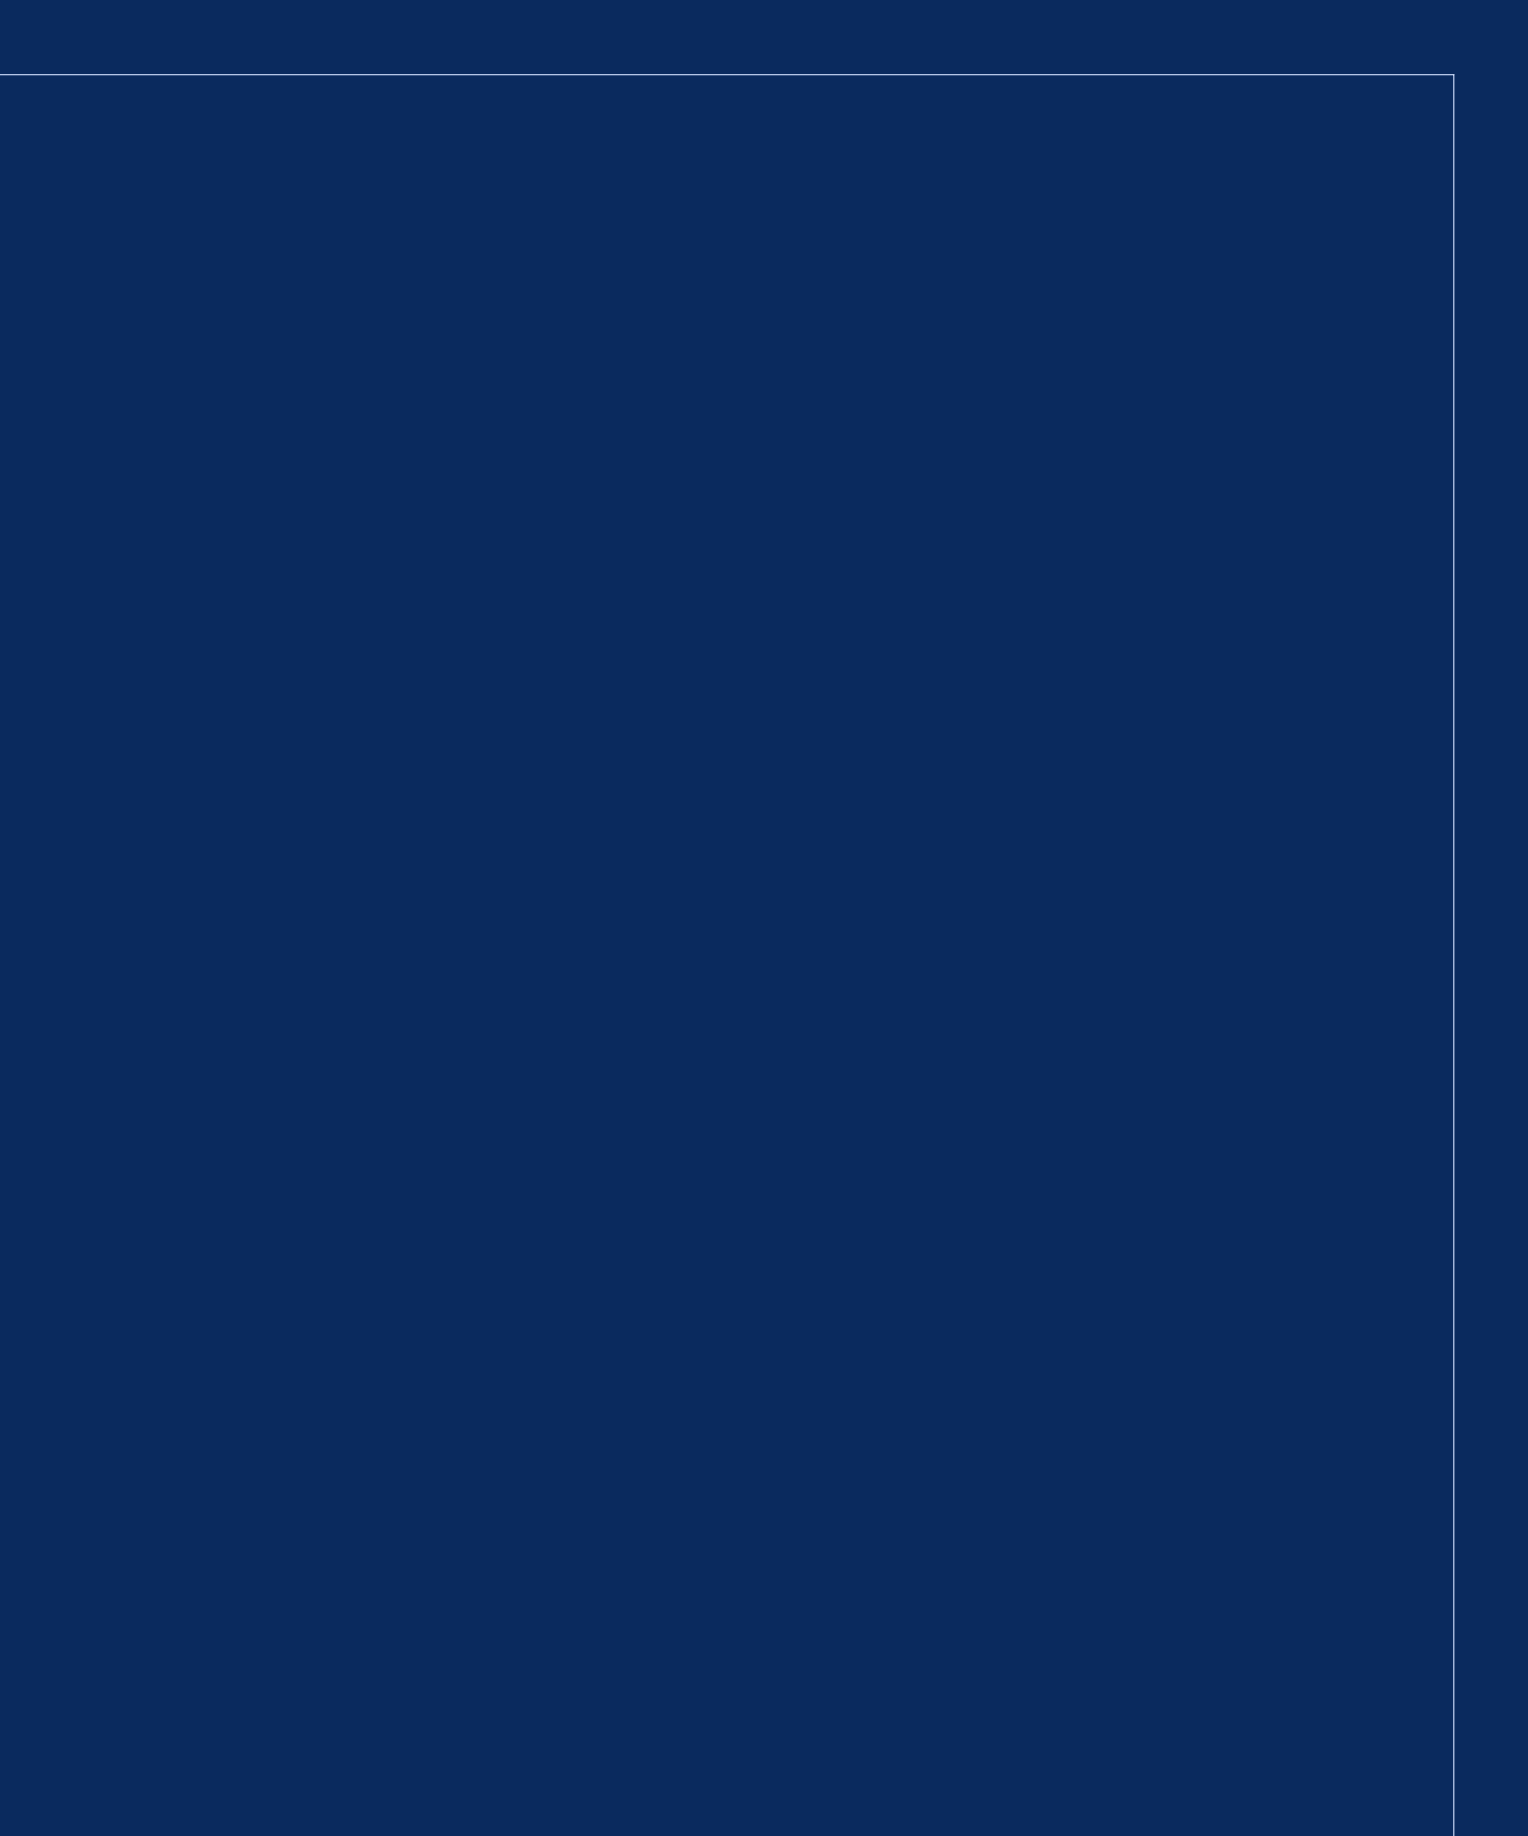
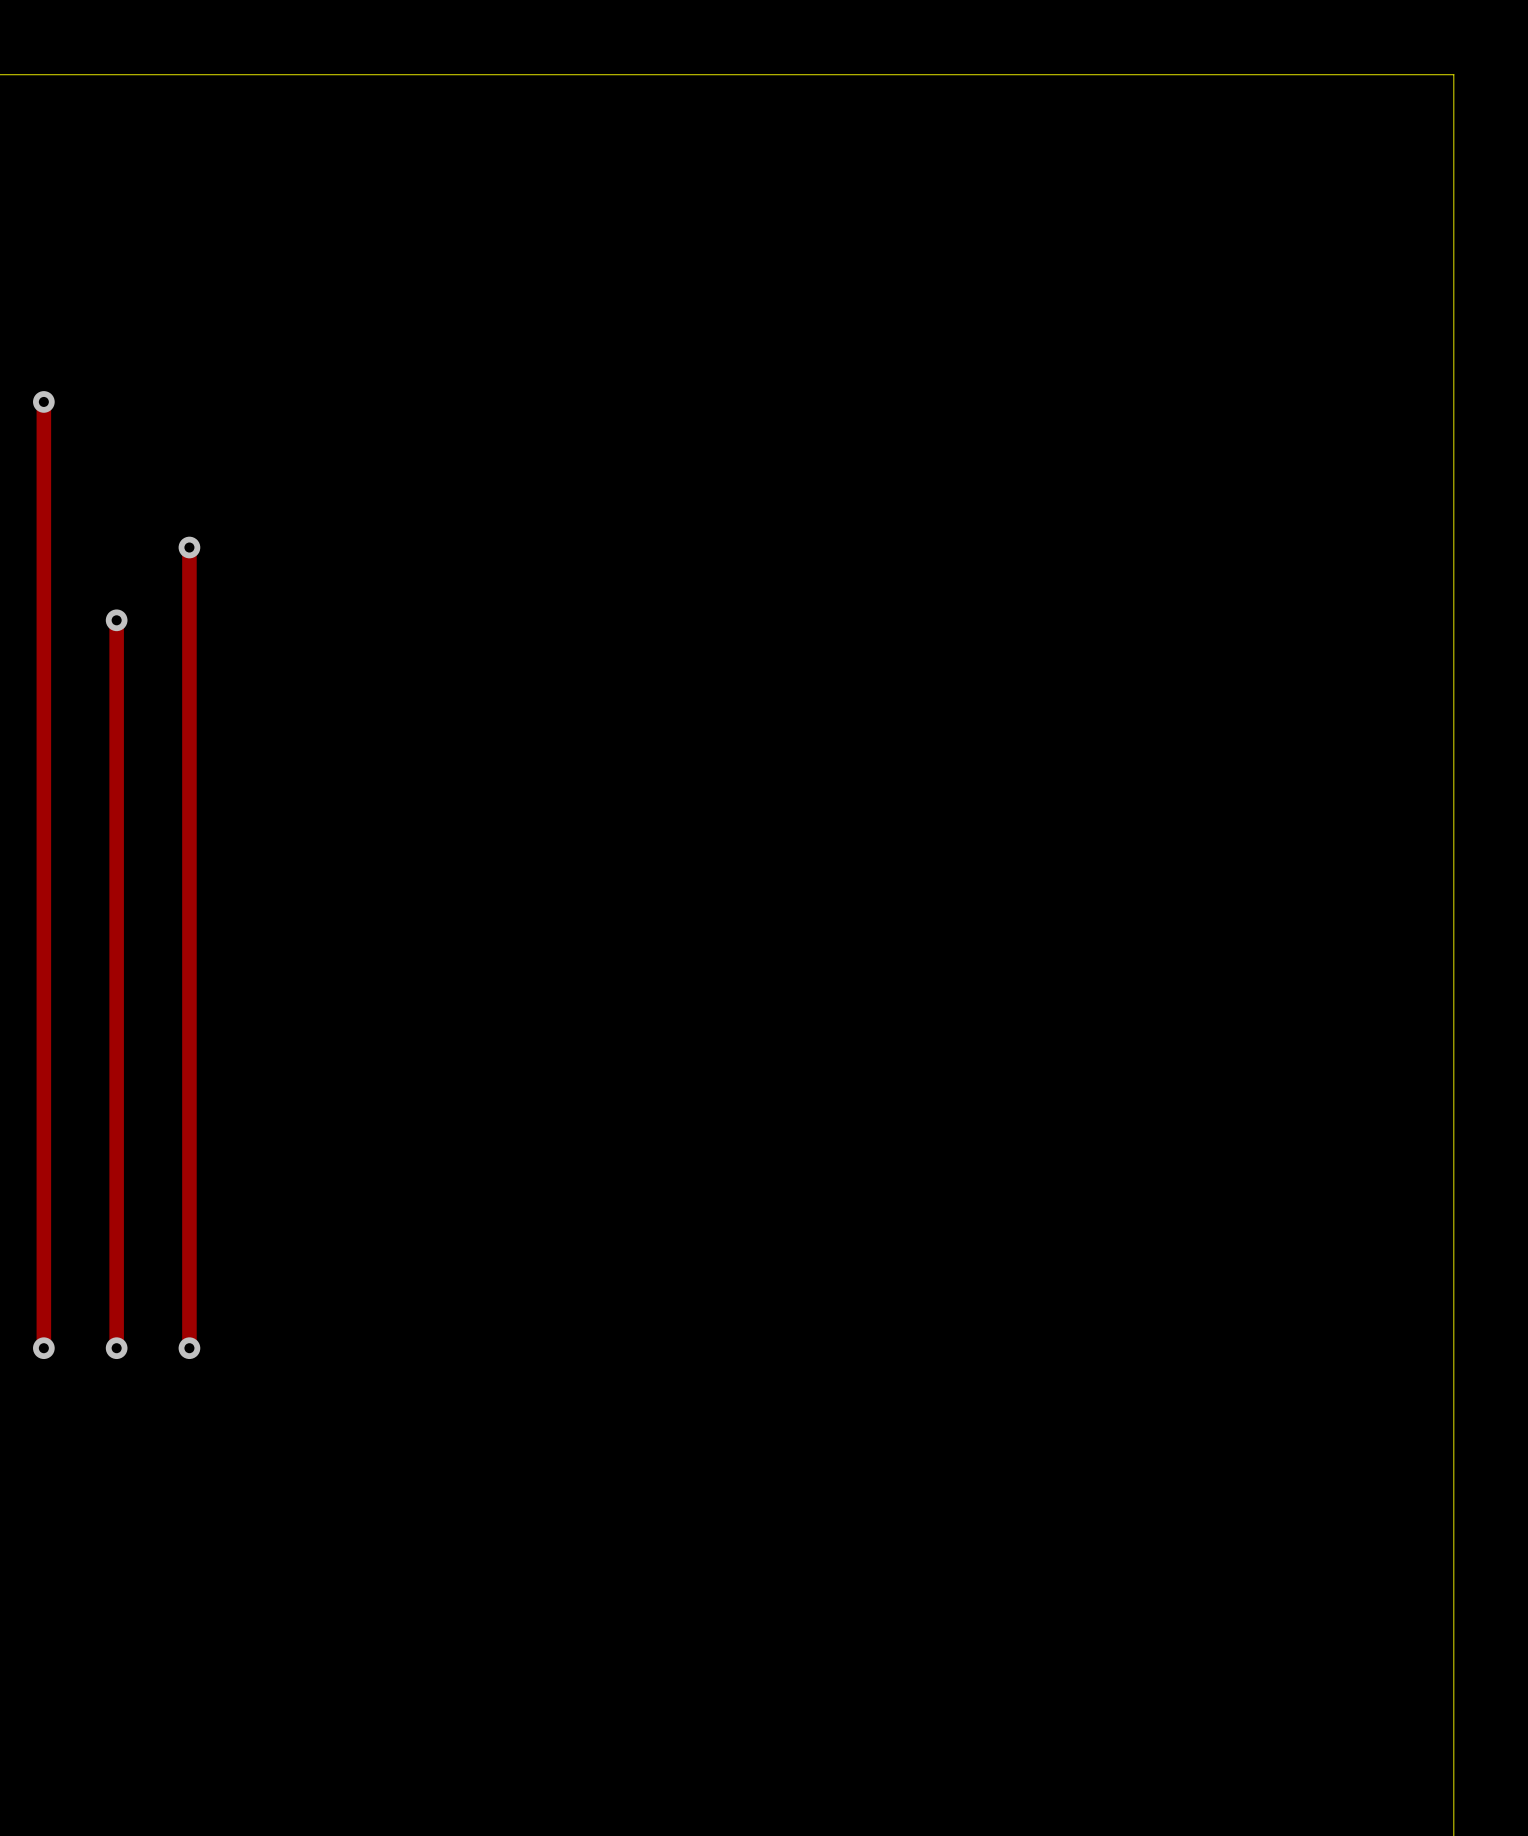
track: none -> (43, 401) (43, 1348)
via: none -> (43, 401)
track: none -> (189, 547) (189, 1348)
via: none -> (189, 547)
track: none -> (116, 620) (116, 1348)
via: none -> (116, 620)
via: none -> (43, 1348)
via: none -> (116, 1348)
via: none -> (189, 1348)

